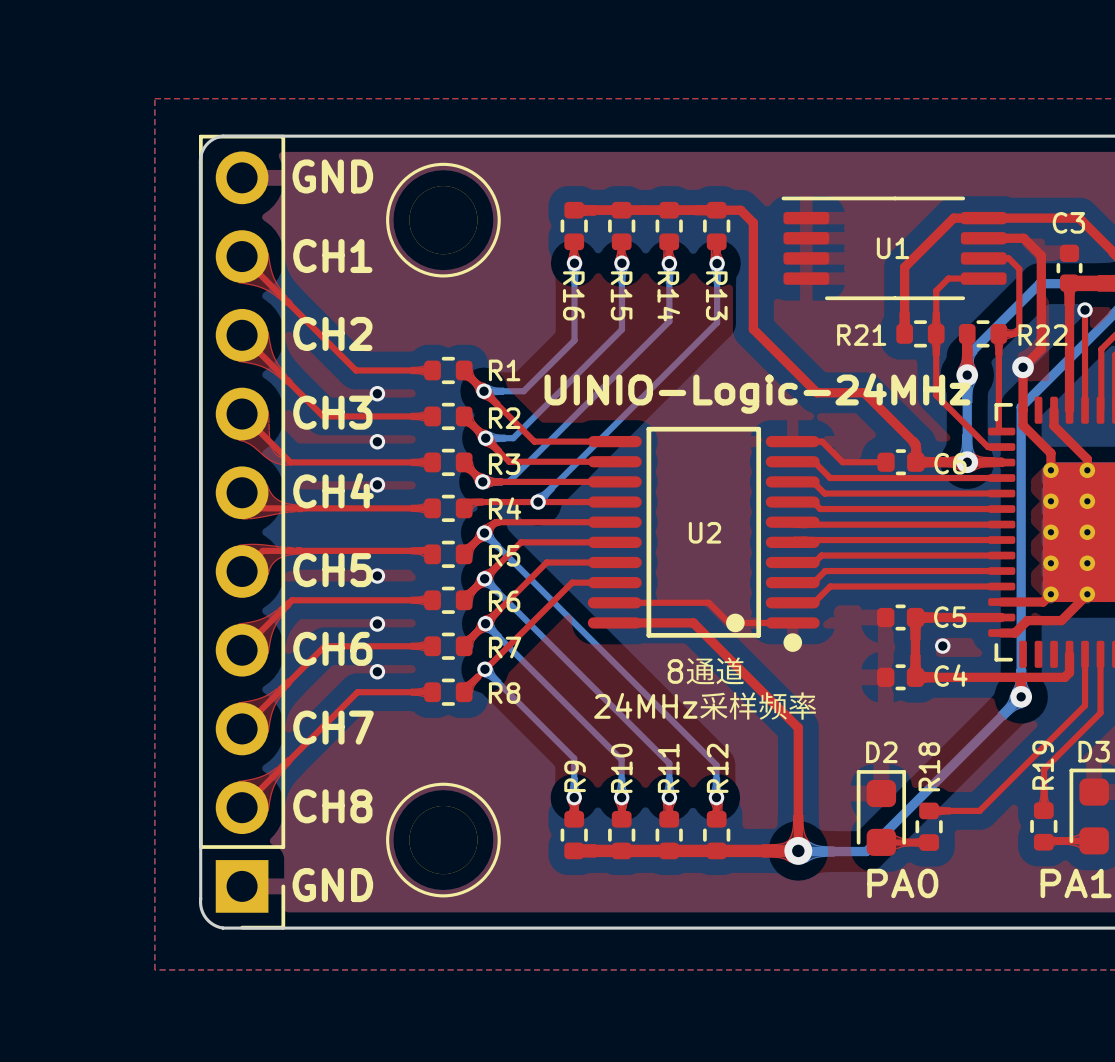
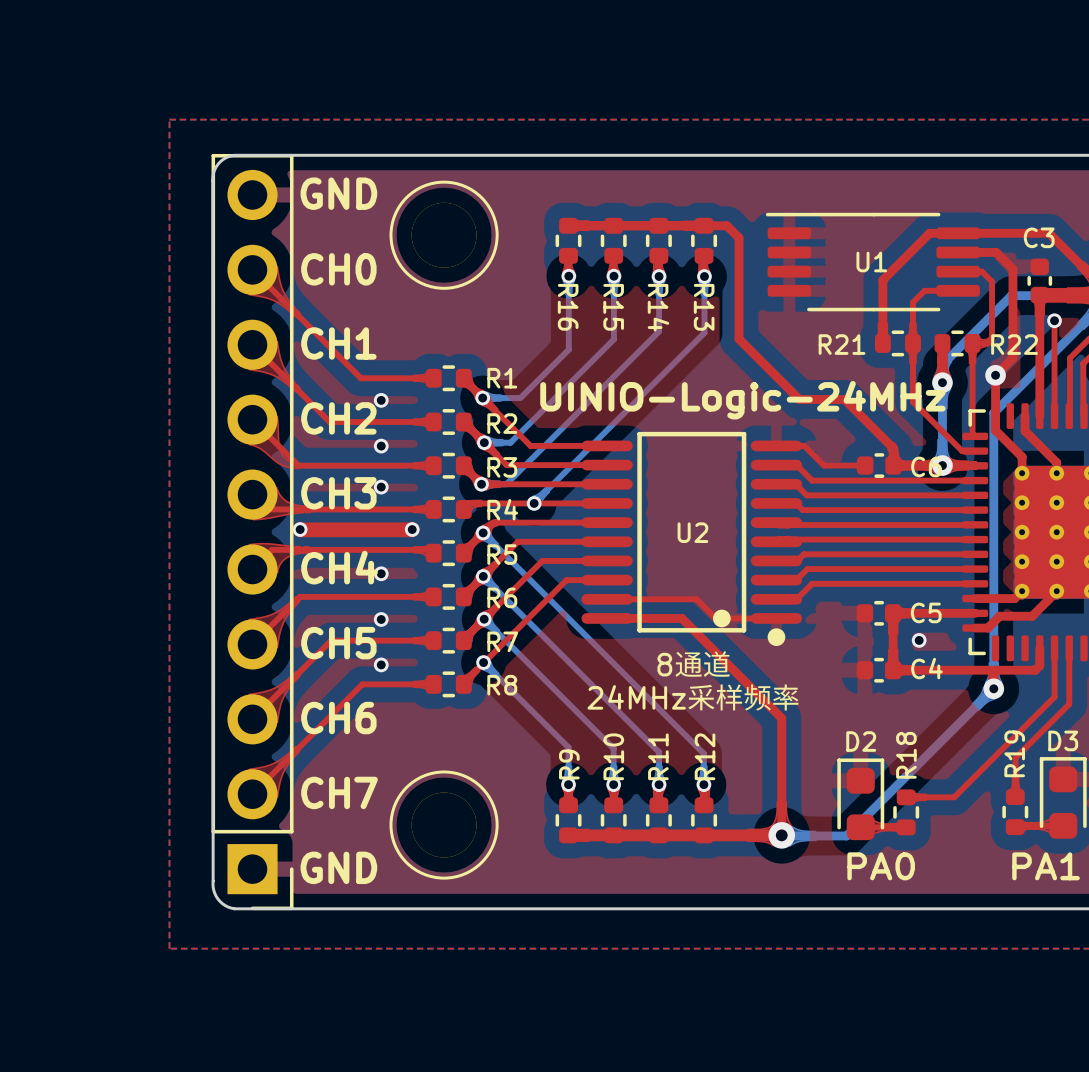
text: CH1 (332, 255) -> CH0 (338, 269)
text: CH2 (332, 333) -> CH1 (338, 343)
text: CH3 (332, 412) -> CH2 (338, 418)
text: CH4 (333, 490) -> CH3 (338, 493)
top track: none -> (300, 529) (411, 529)
via: none -> (300, 529)
via: none -> (412, 529)
text: CH5 (332, 570) -> CH4 (339, 567)
text: CH6 (332, 648) -> CH5 (338, 643)
text: CH7 (333, 727) -> CH6 (338, 718)
text: CH8 (332, 806) -> CH7 (339, 792)

